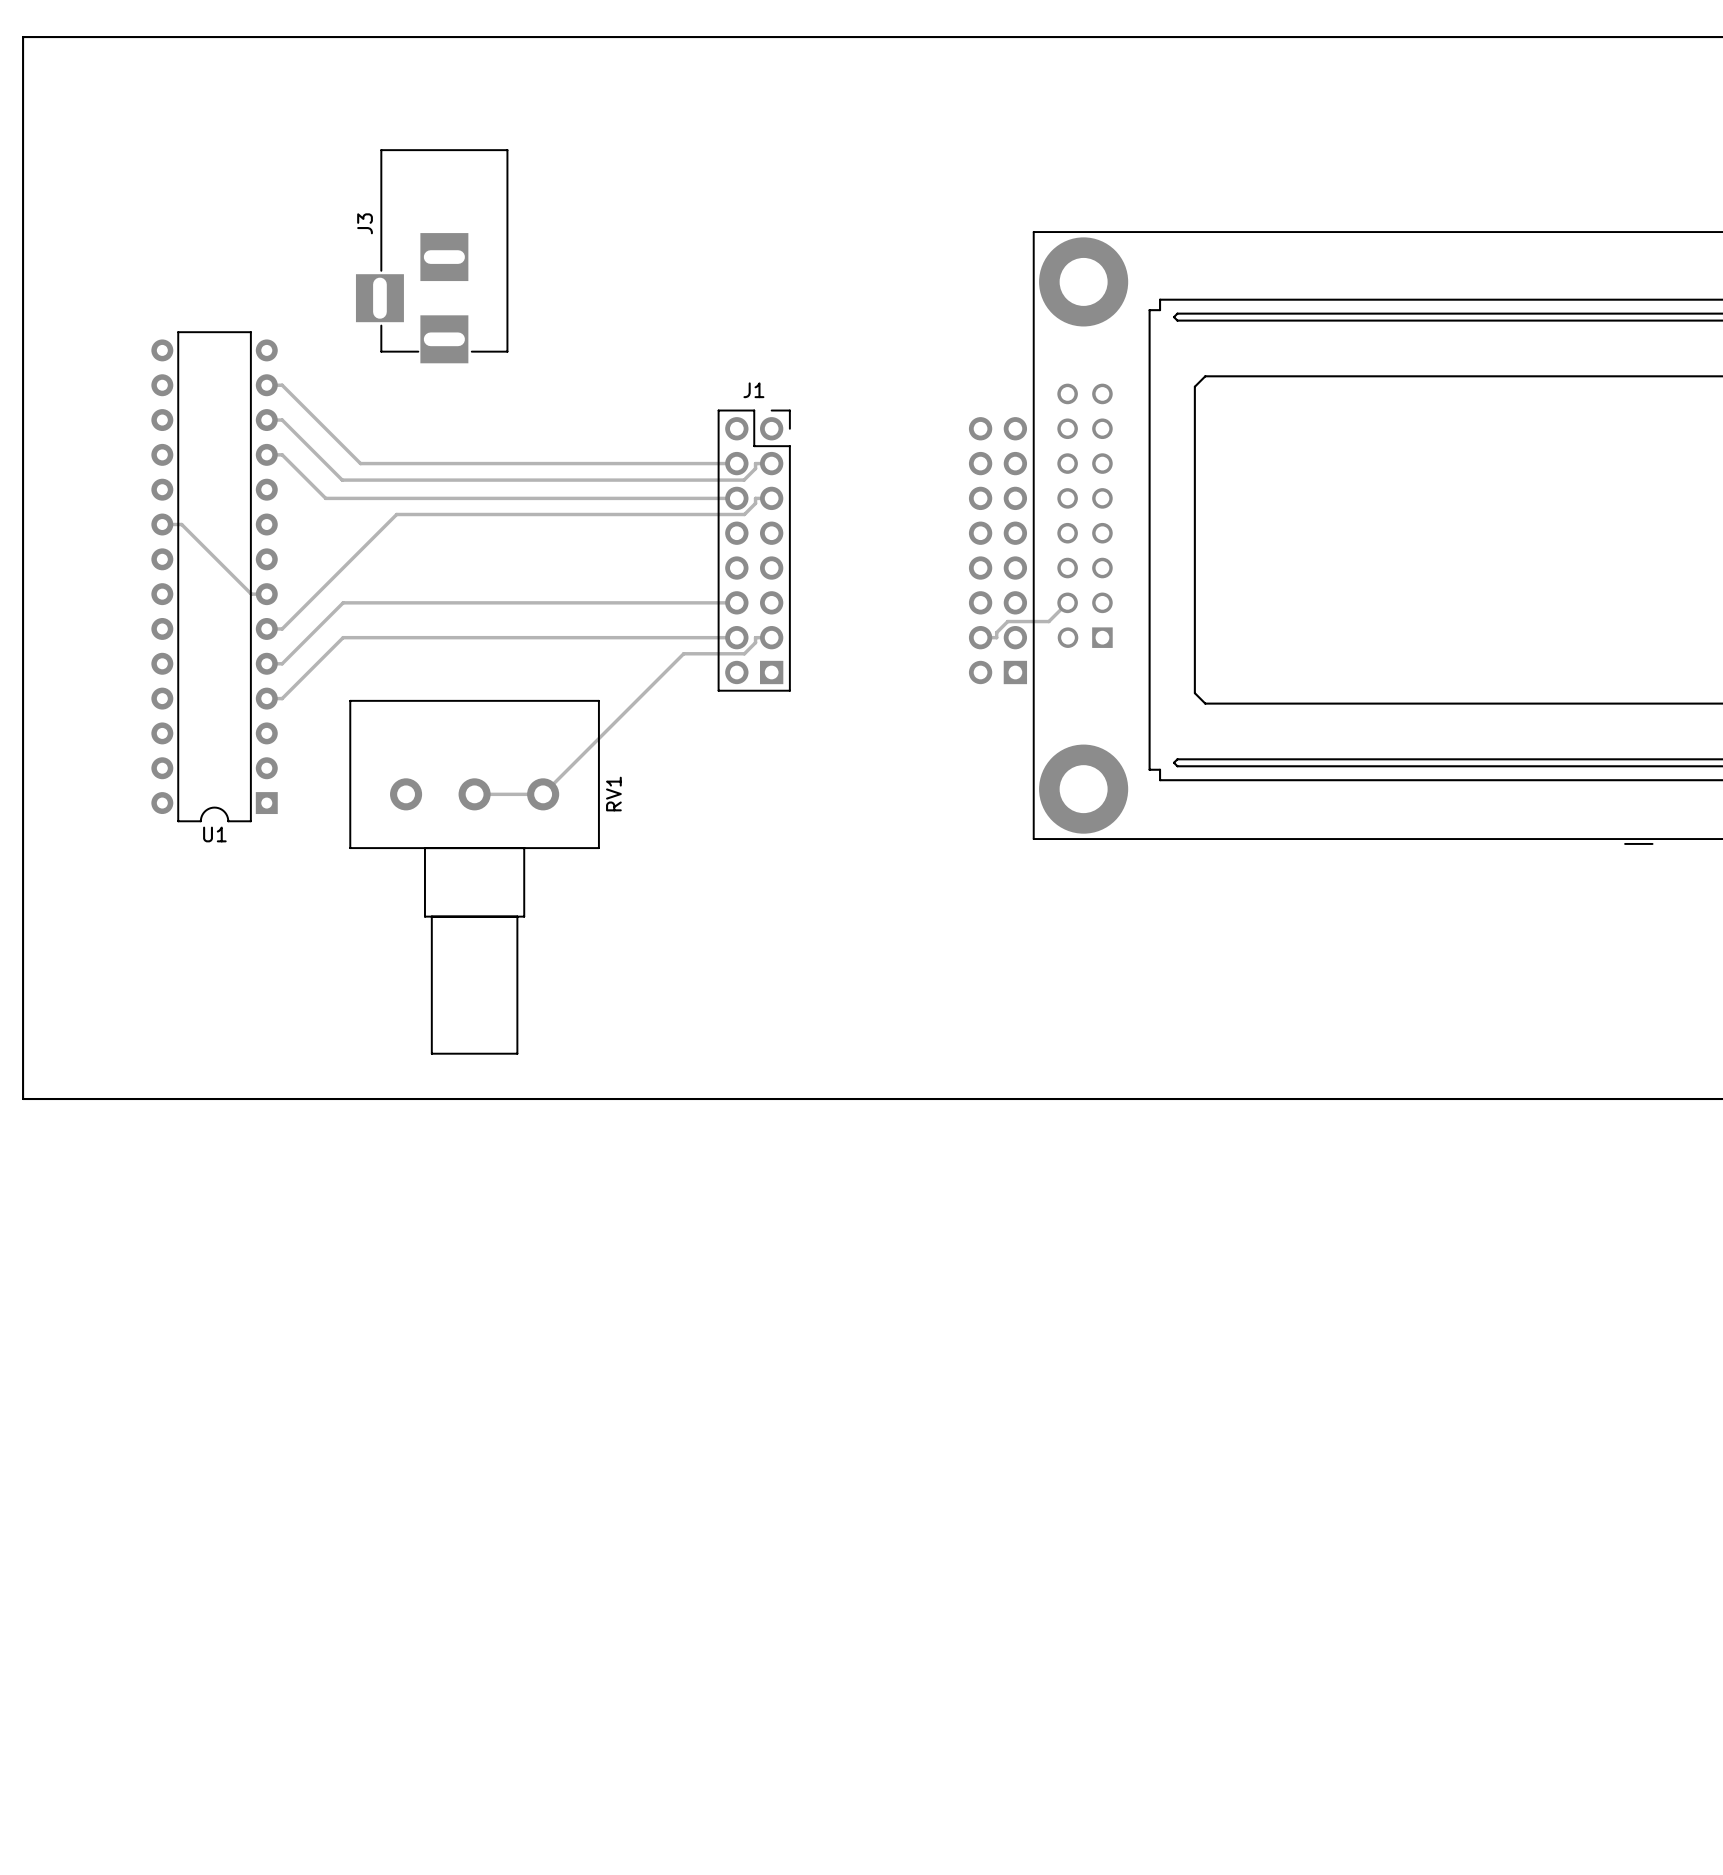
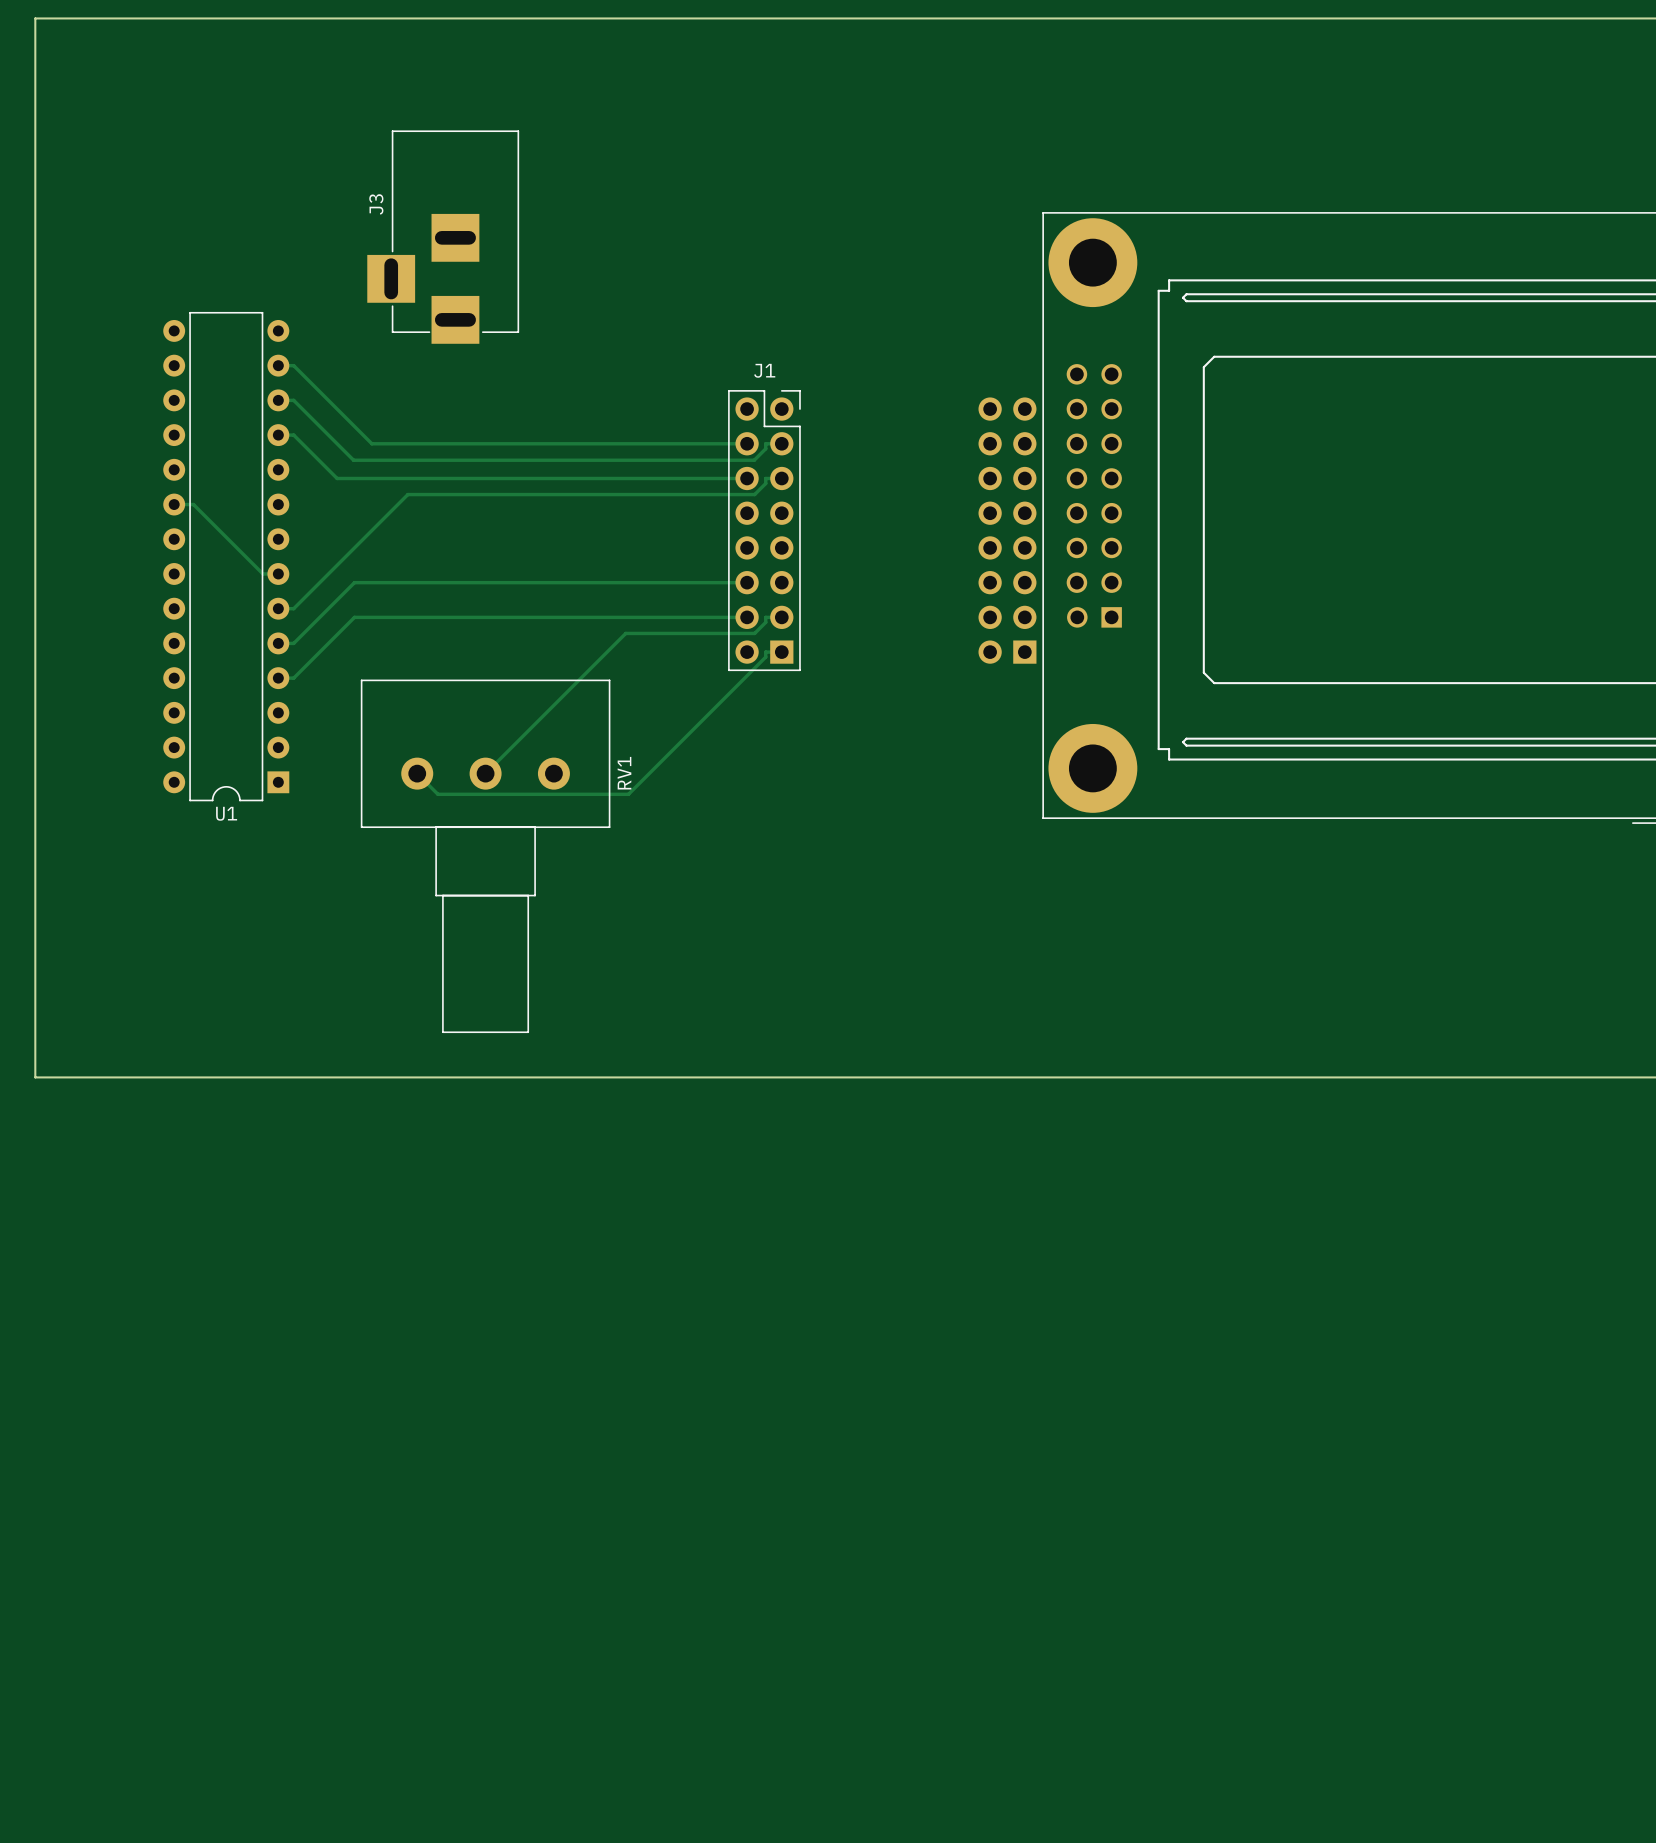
track: (1067, 602) (1048, 621) (1007, 621) (996, 632) (996, 637) (980, 637) -> none
track: (683, 653) (543, 794) (474, 794) -> (694, 633) (625, 633) (485, 773)
track: none -> (781, 652) (765, 652) (765, 657) (628, 794) (437, 794) (417, 773)

